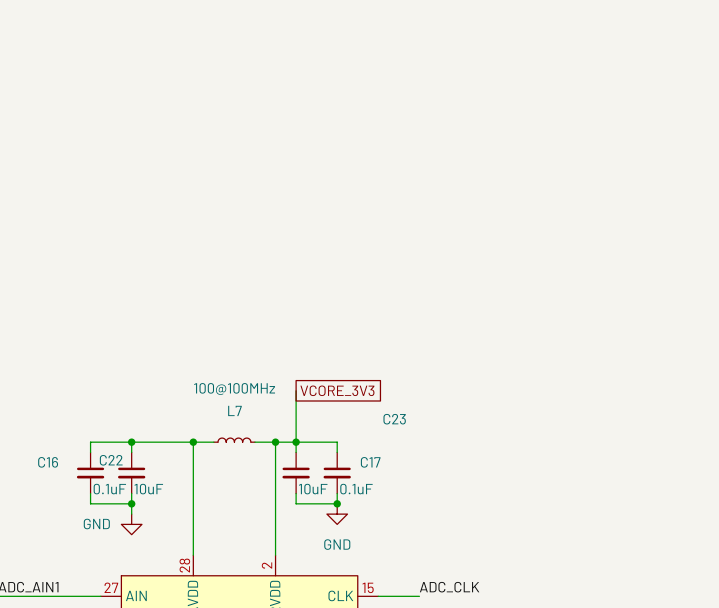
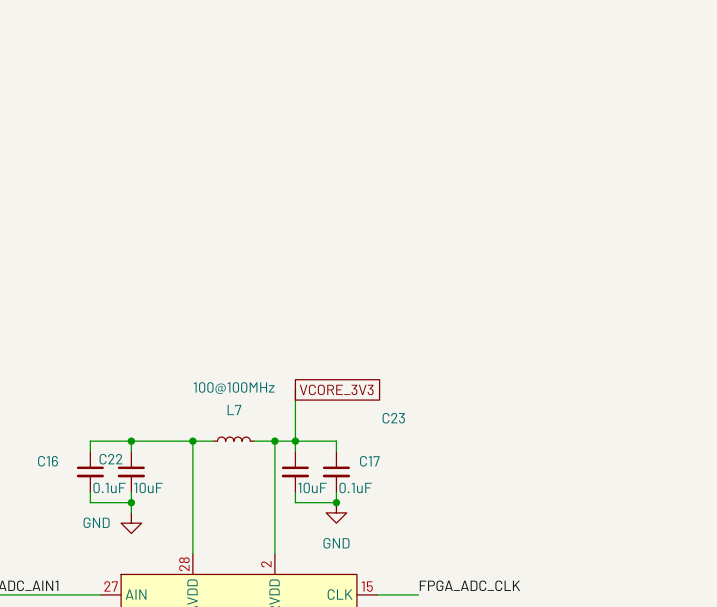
label: ADC_CLK (449, 587) -> FPGA_ADC_CLK (469, 585)

